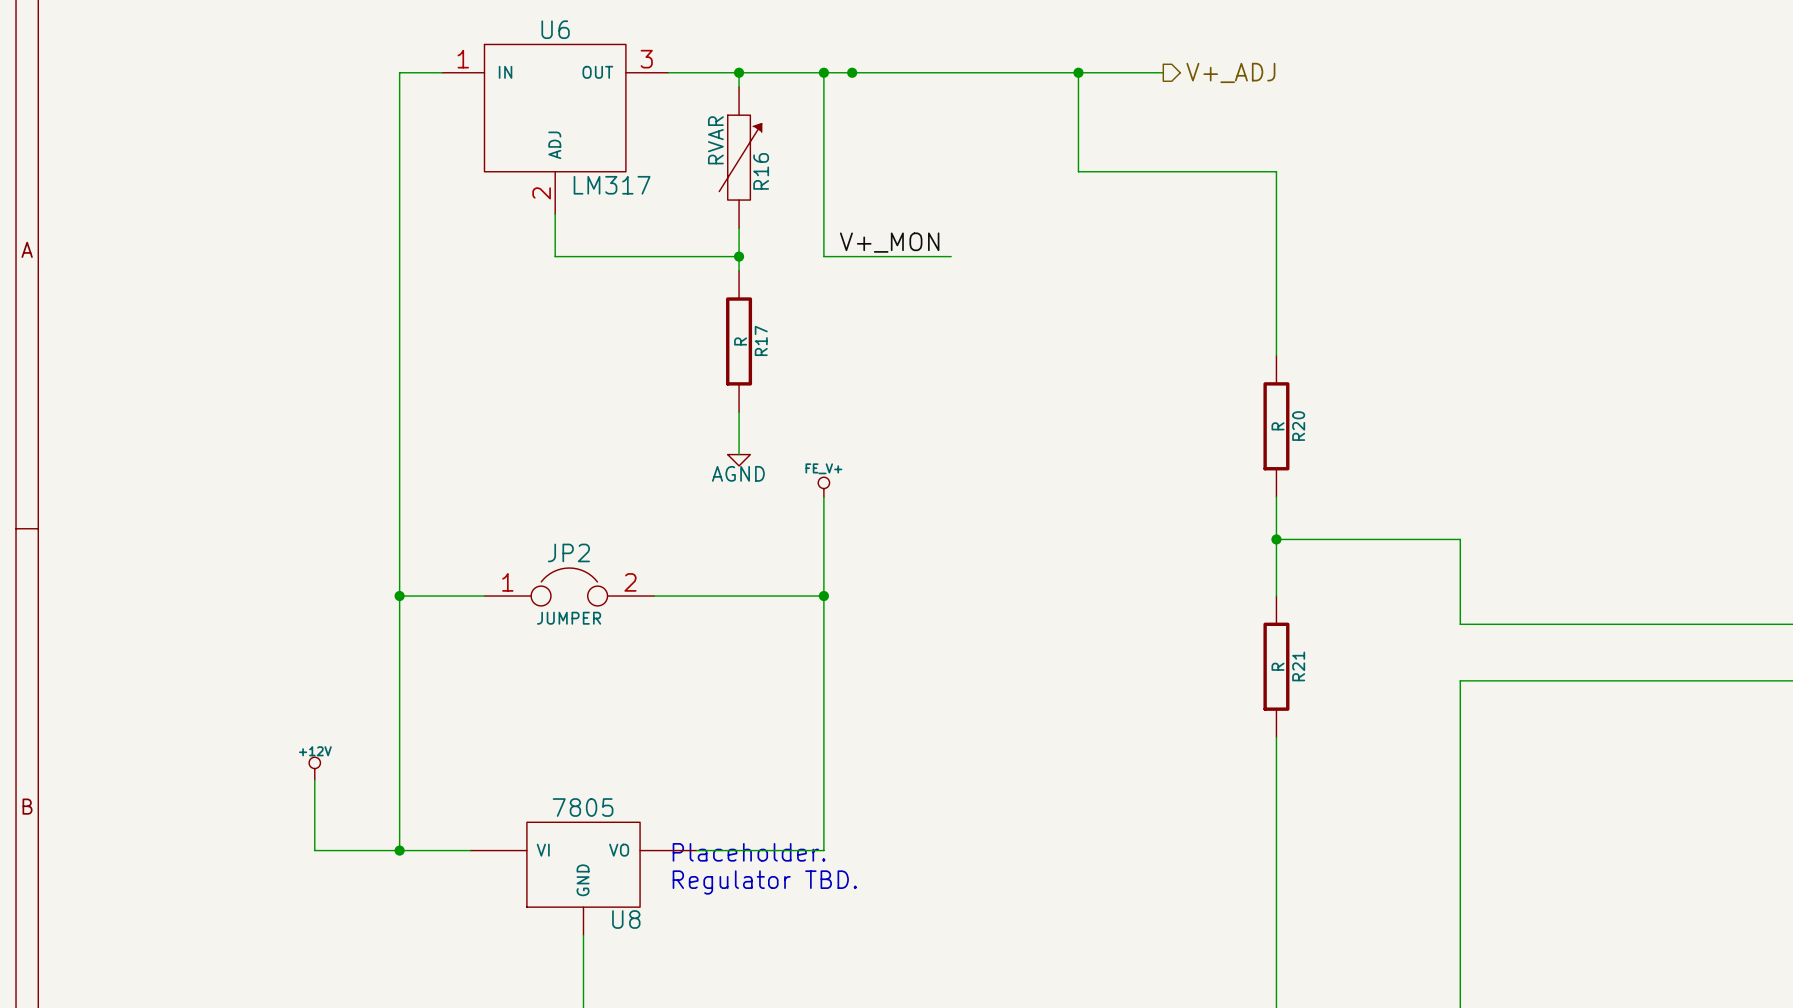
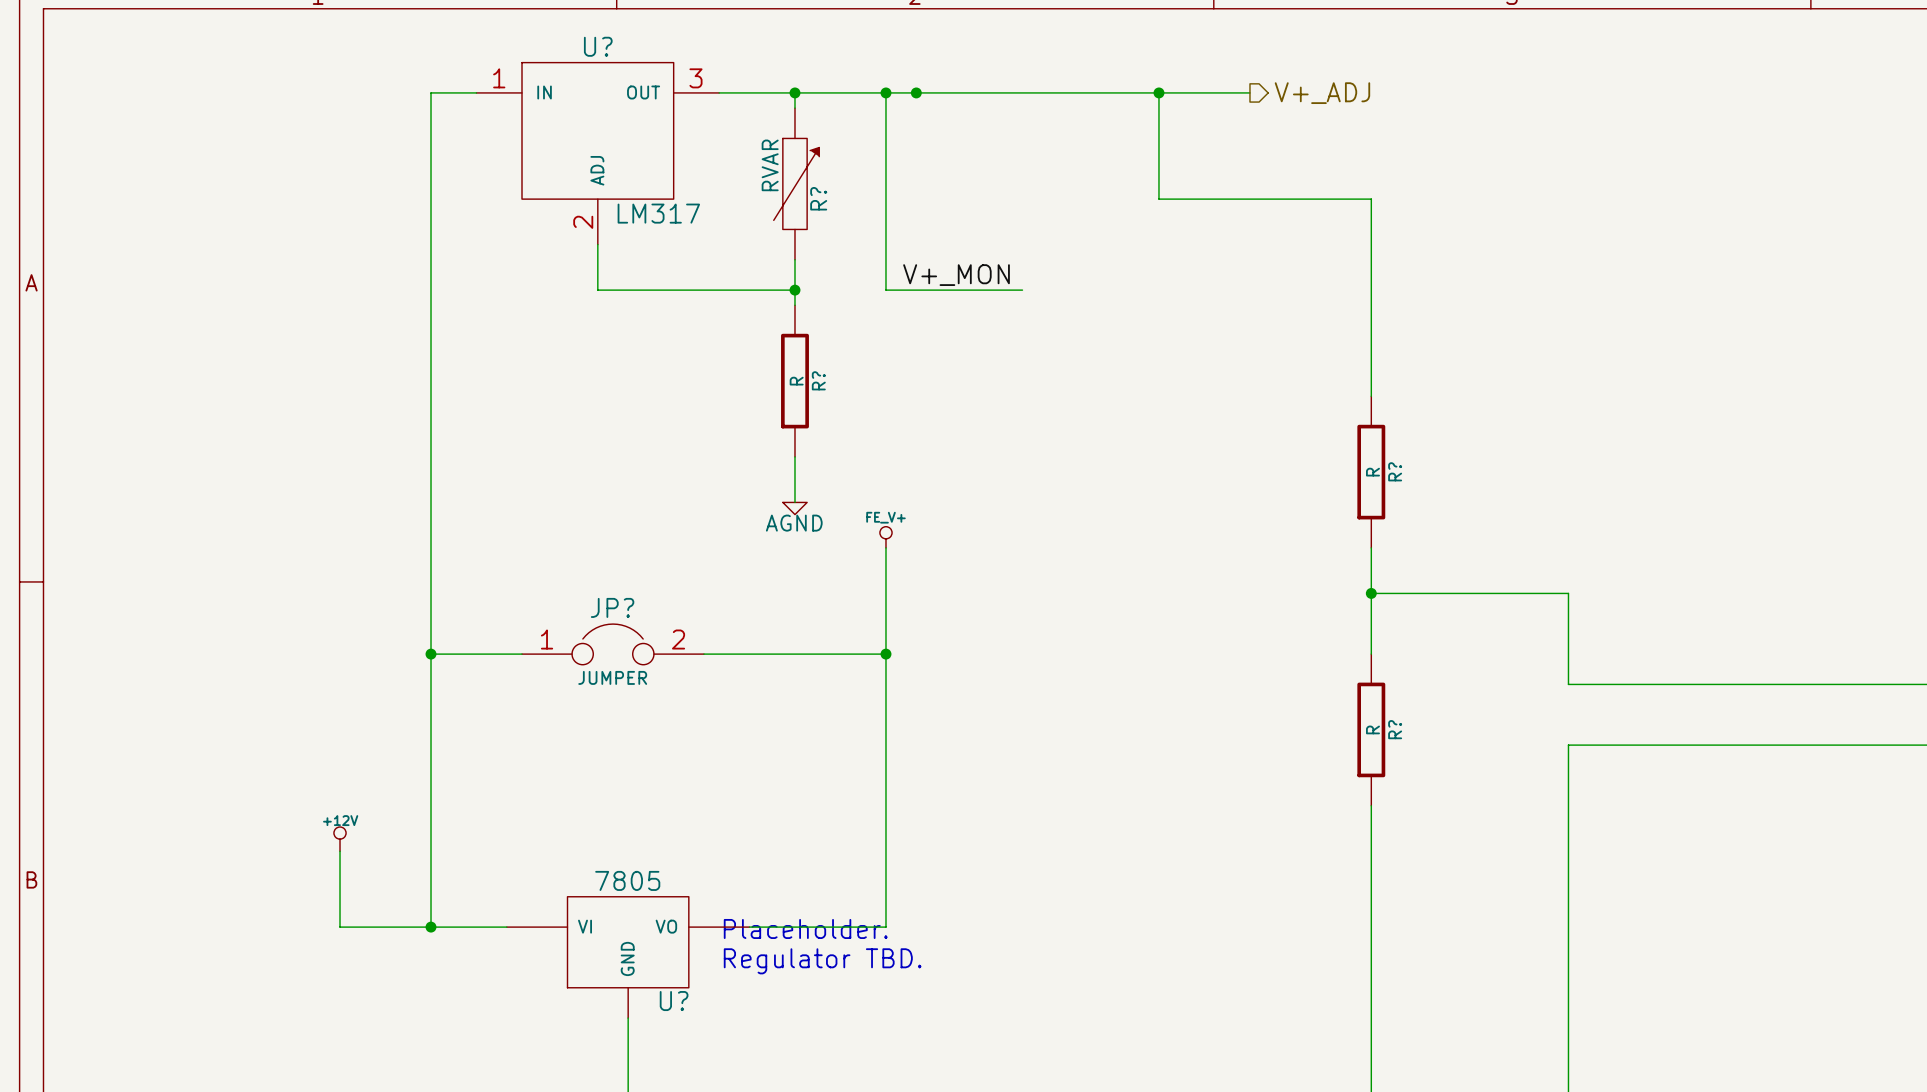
U6 name: U6 (555, 29) -> U? (598, 46)
R16 name: R16 (761, 171) -> R? (818, 198)
R17 name: R17 (761, 340) -> R? (818, 380)
R20 name: R20 (1298, 426) -> R? (1395, 471)
JP2 name: JP2 (568, 552) -> JP? (612, 607)
R21 name: R21 (1298, 666) -> R? (1395, 729)
U8 name: U8 (626, 919) -> U? (674, 1001)

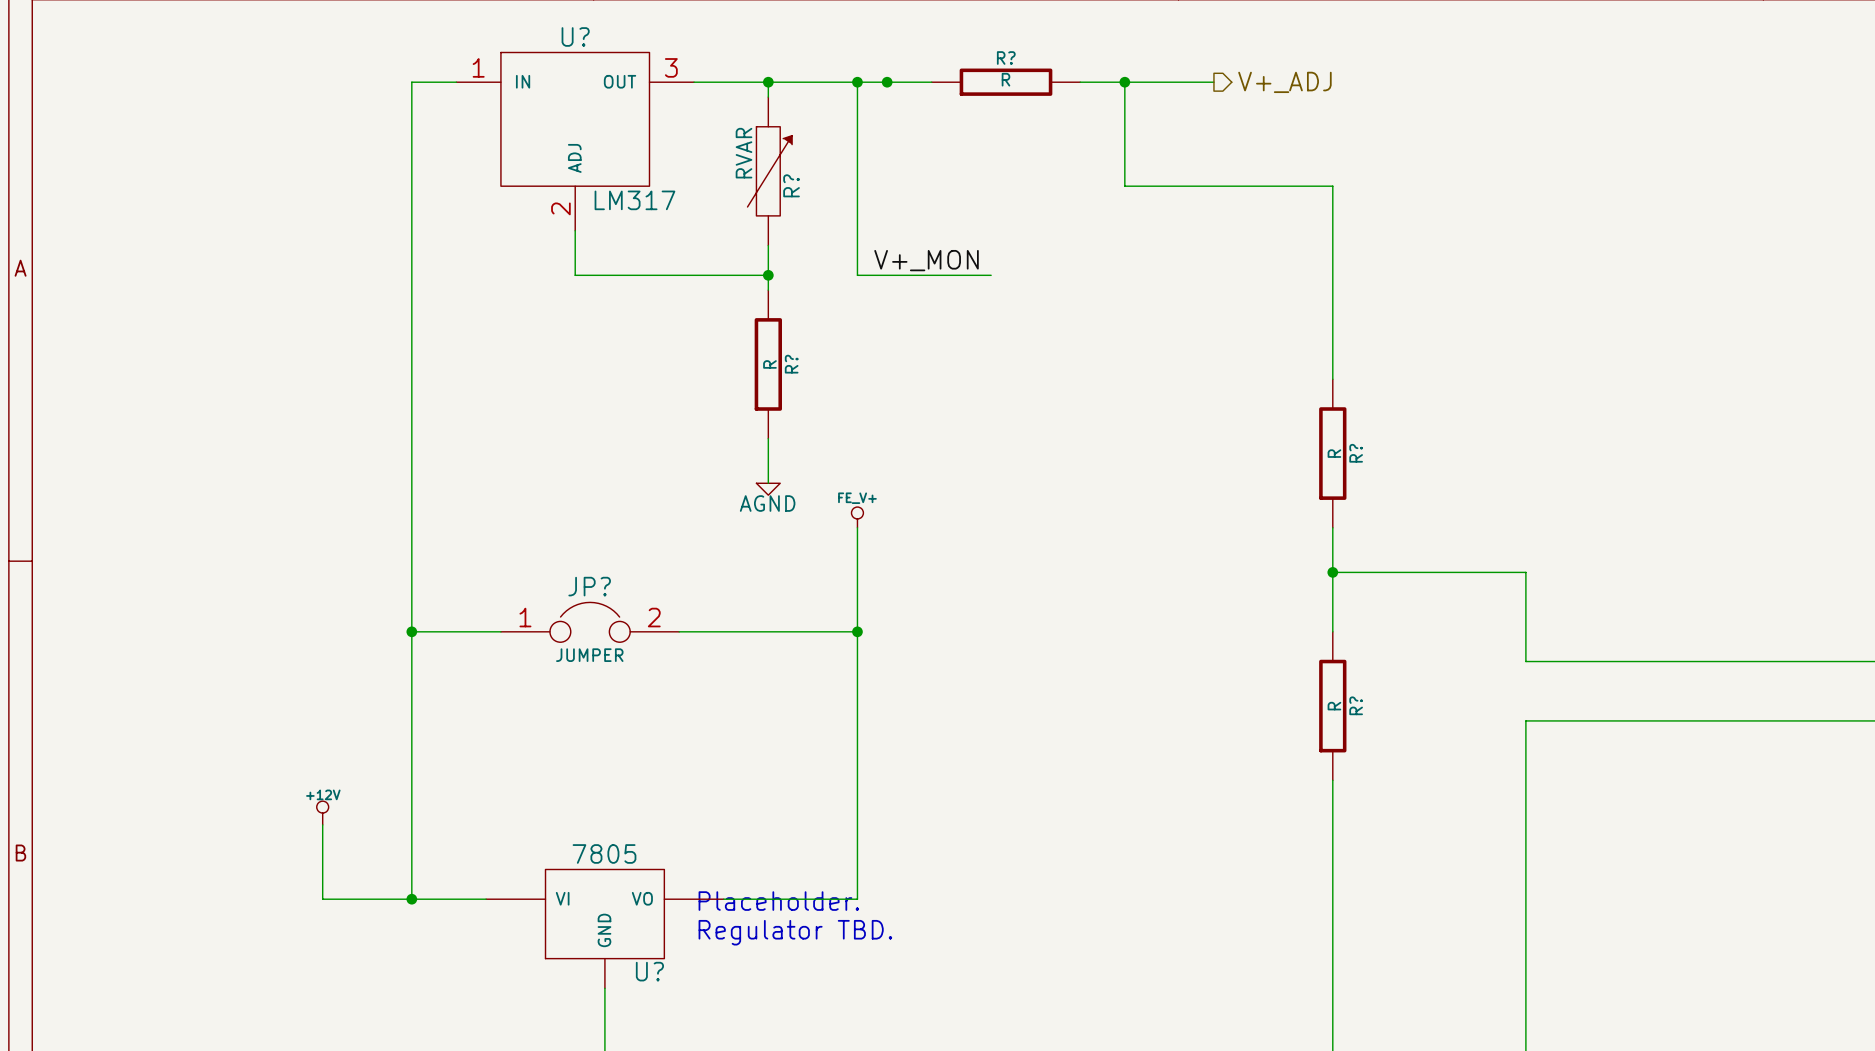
wire: (961, 92) (1113, 92) -> none
R?: none -> R (1006, 82)

